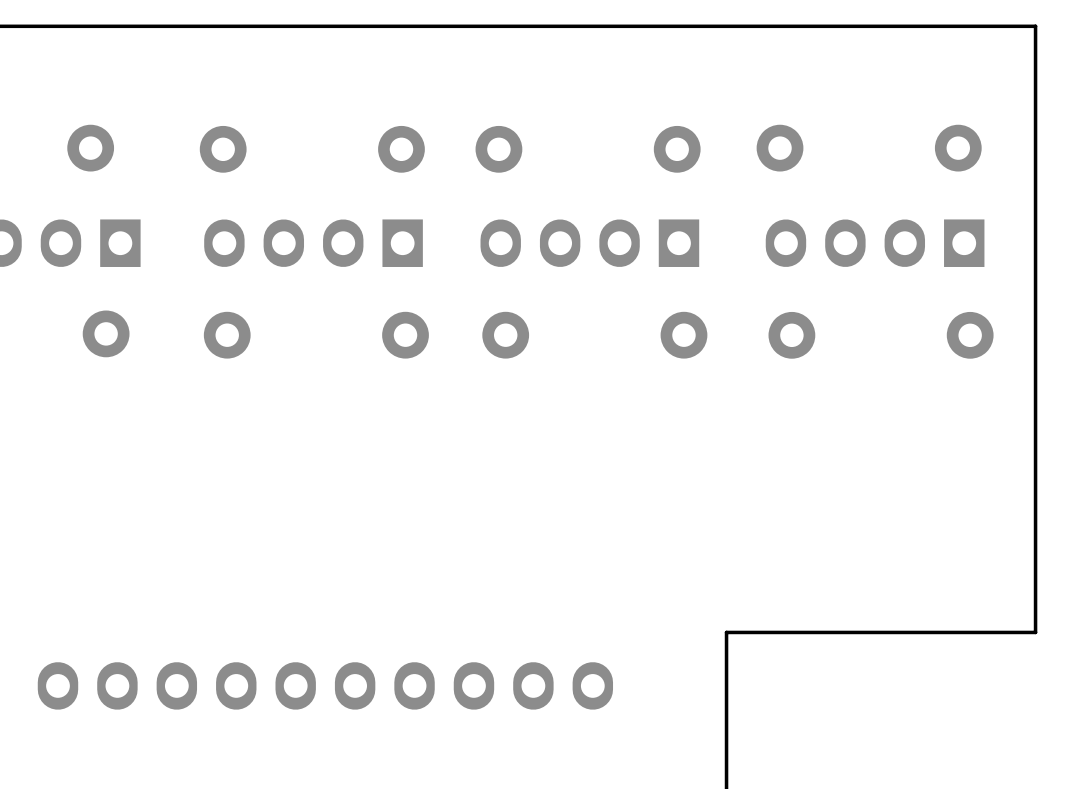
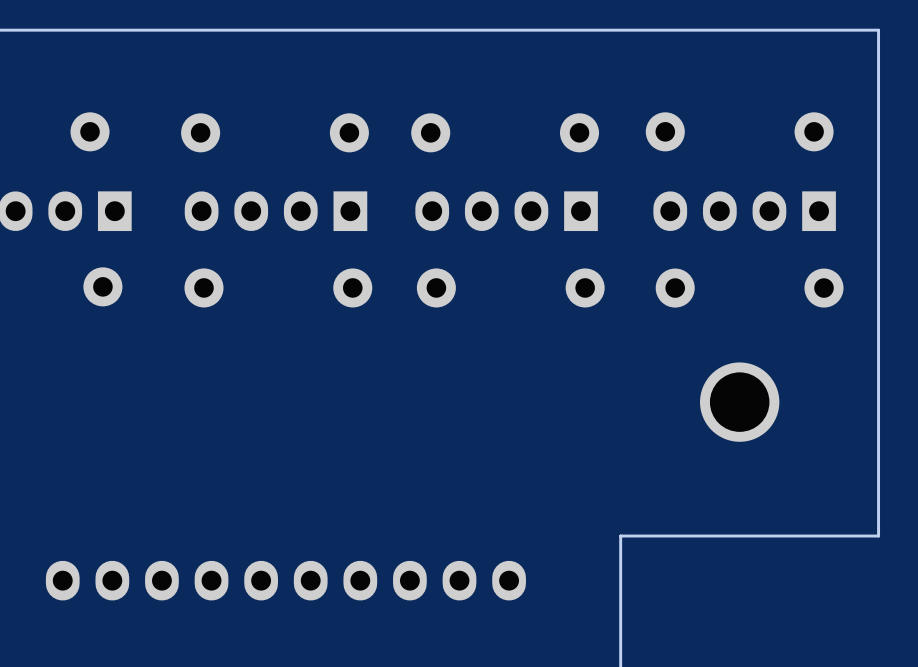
part: none -> (739, 402)

